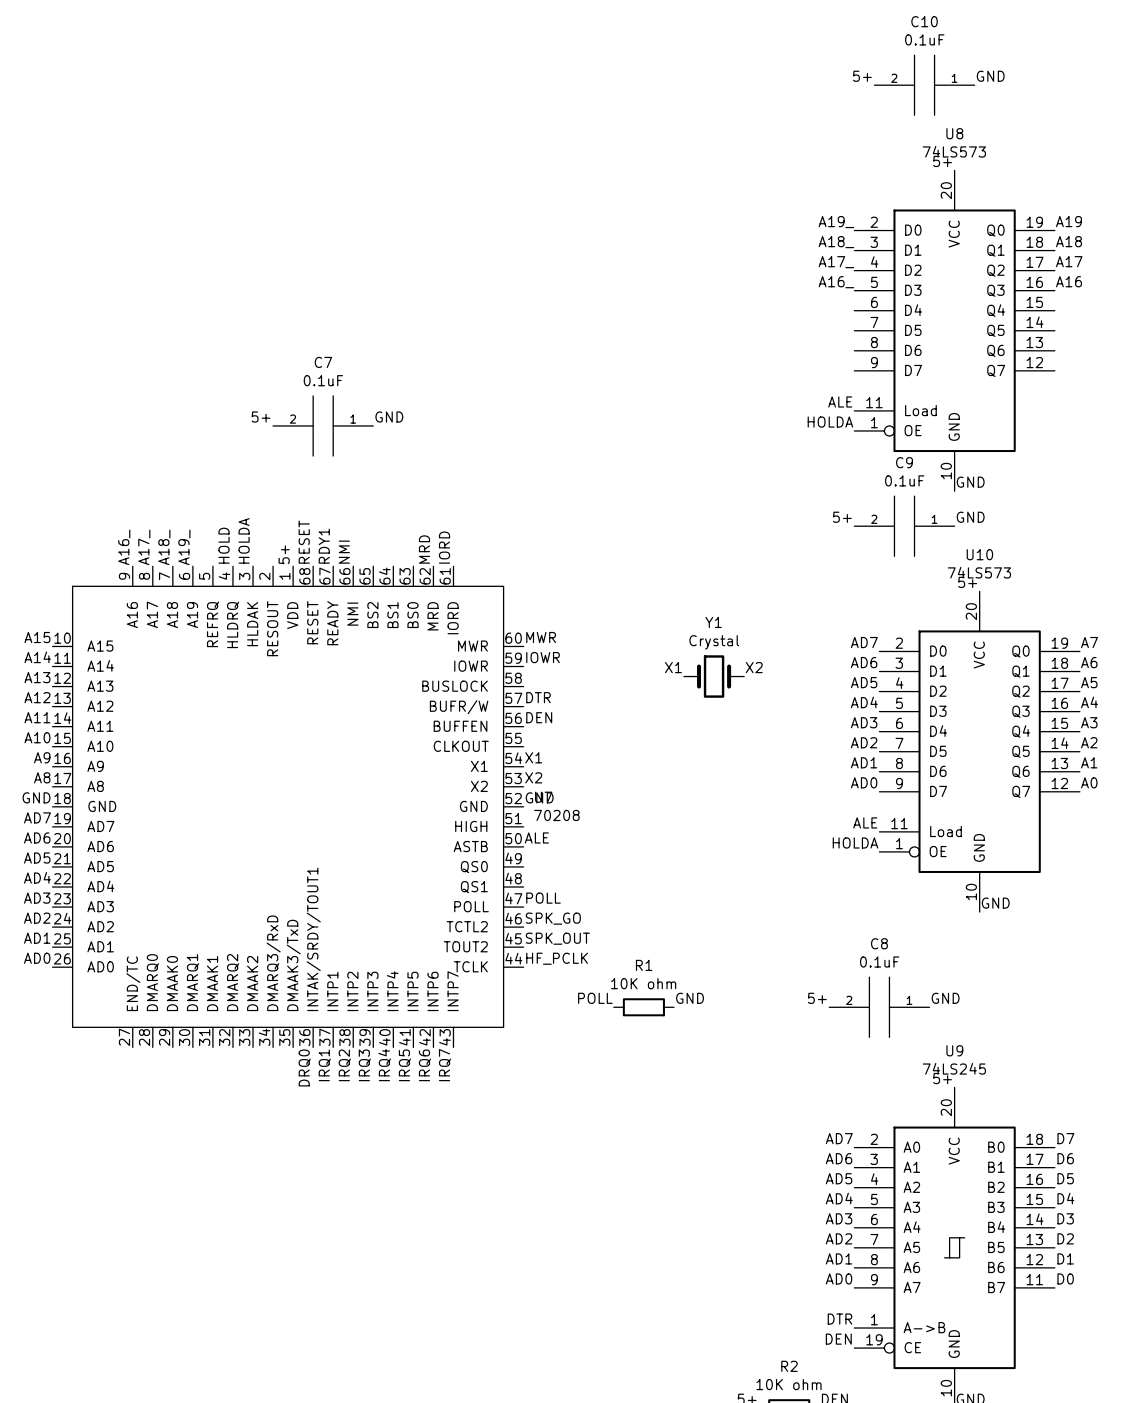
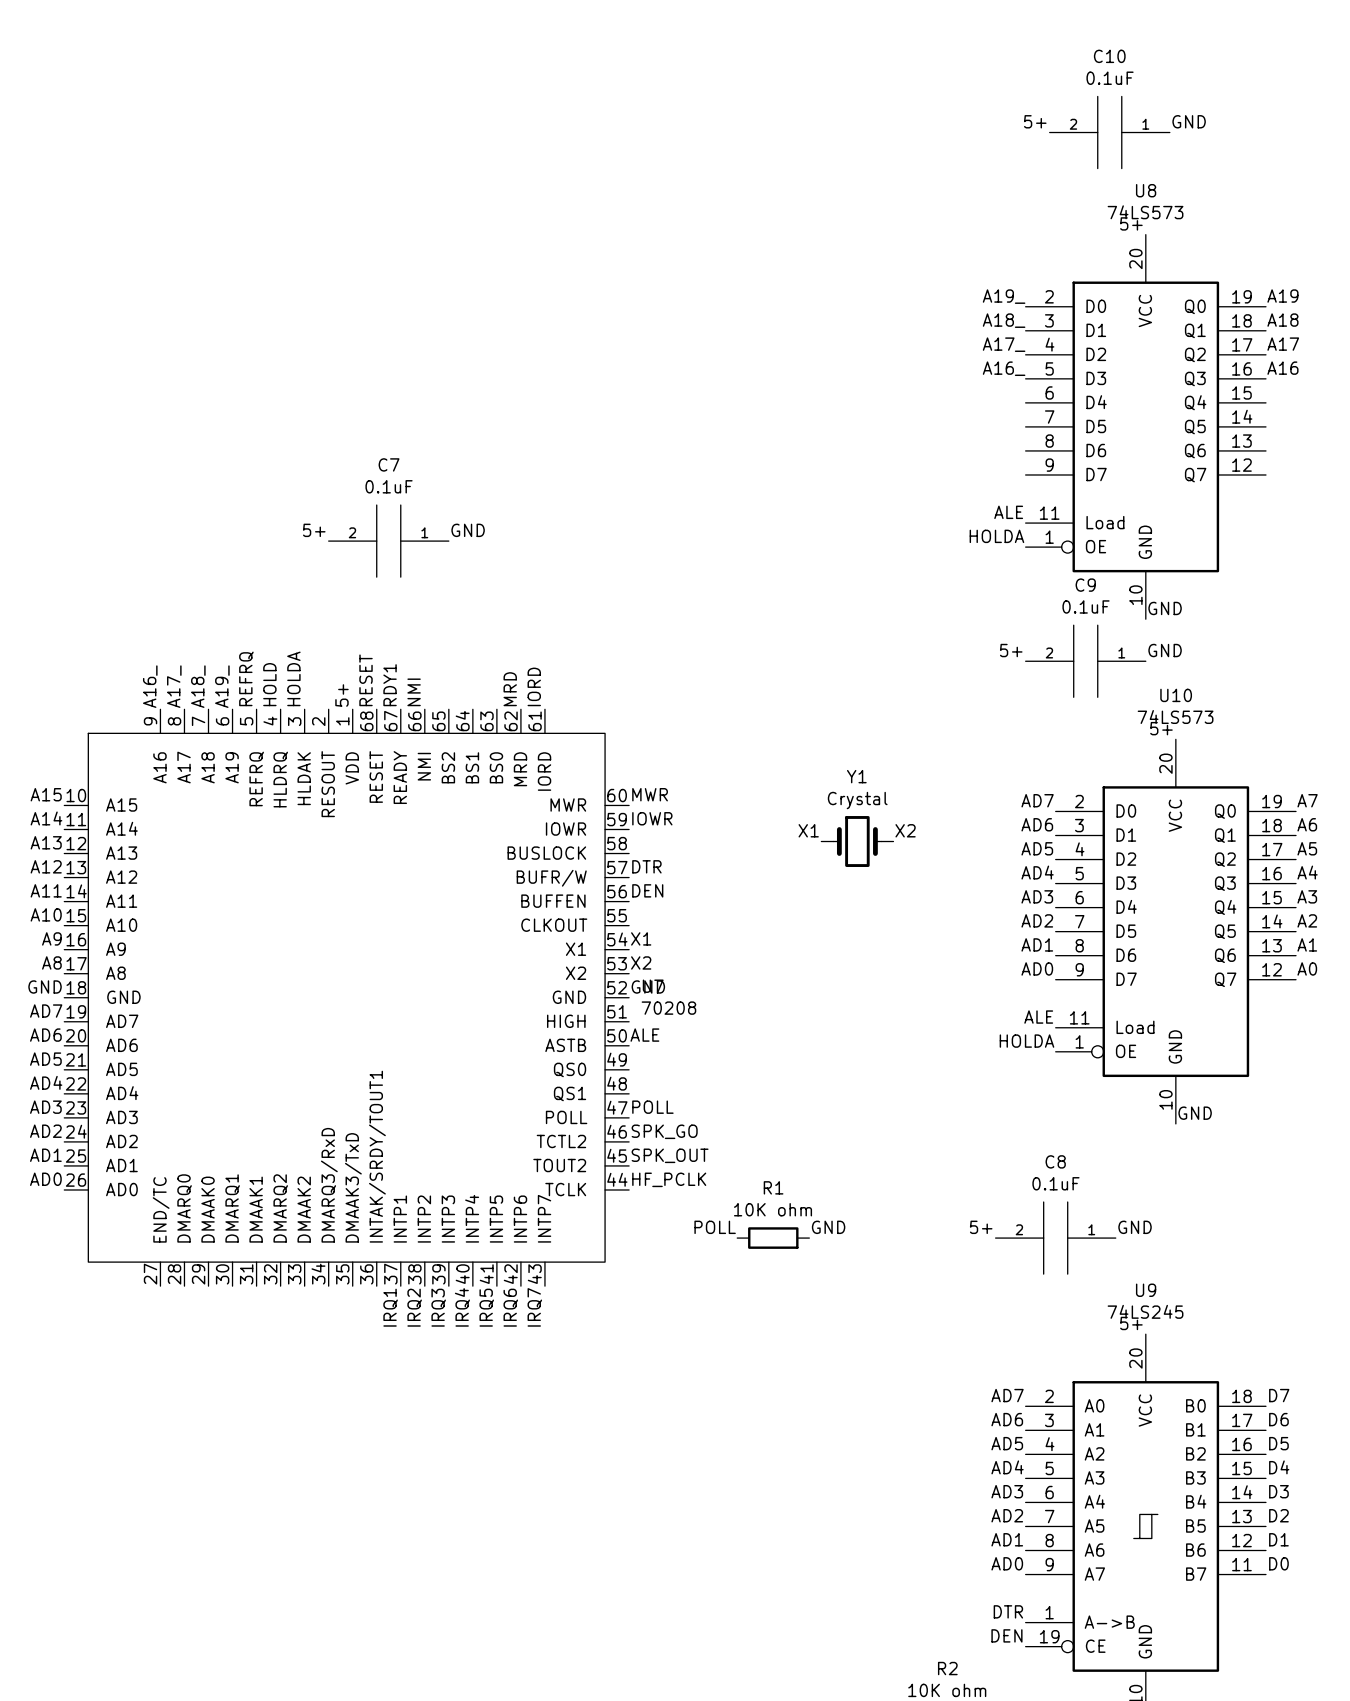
label: none -> REFRQ (246, 678)
label: DRQ0 (304, 1067) -> none

